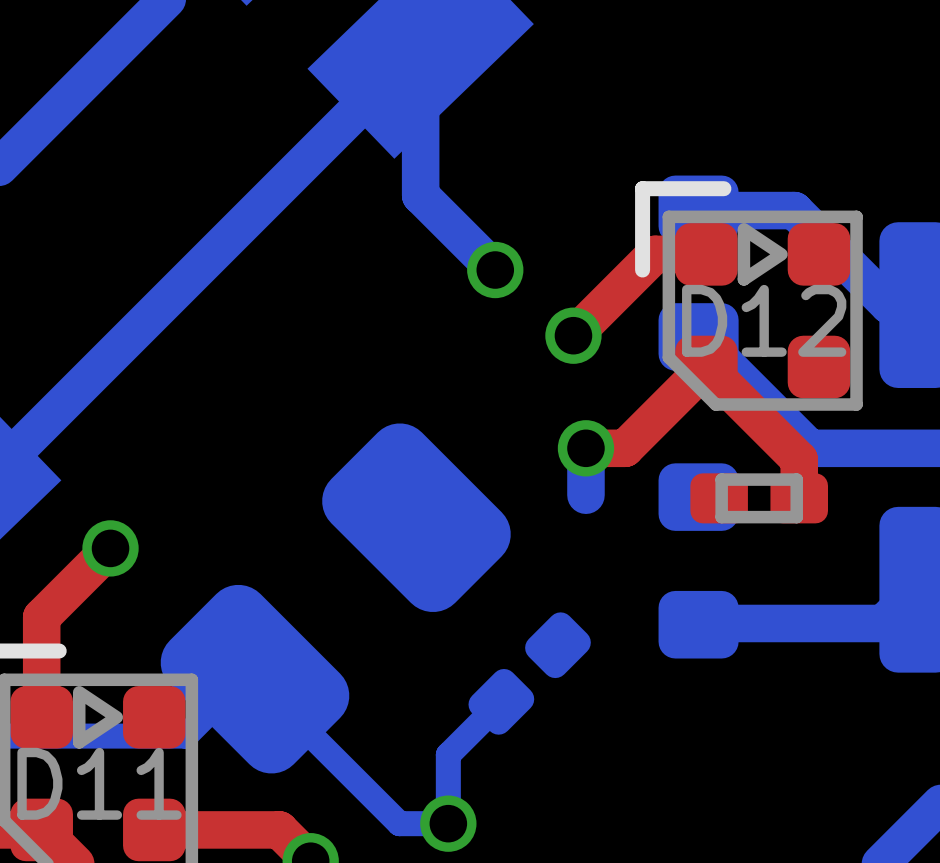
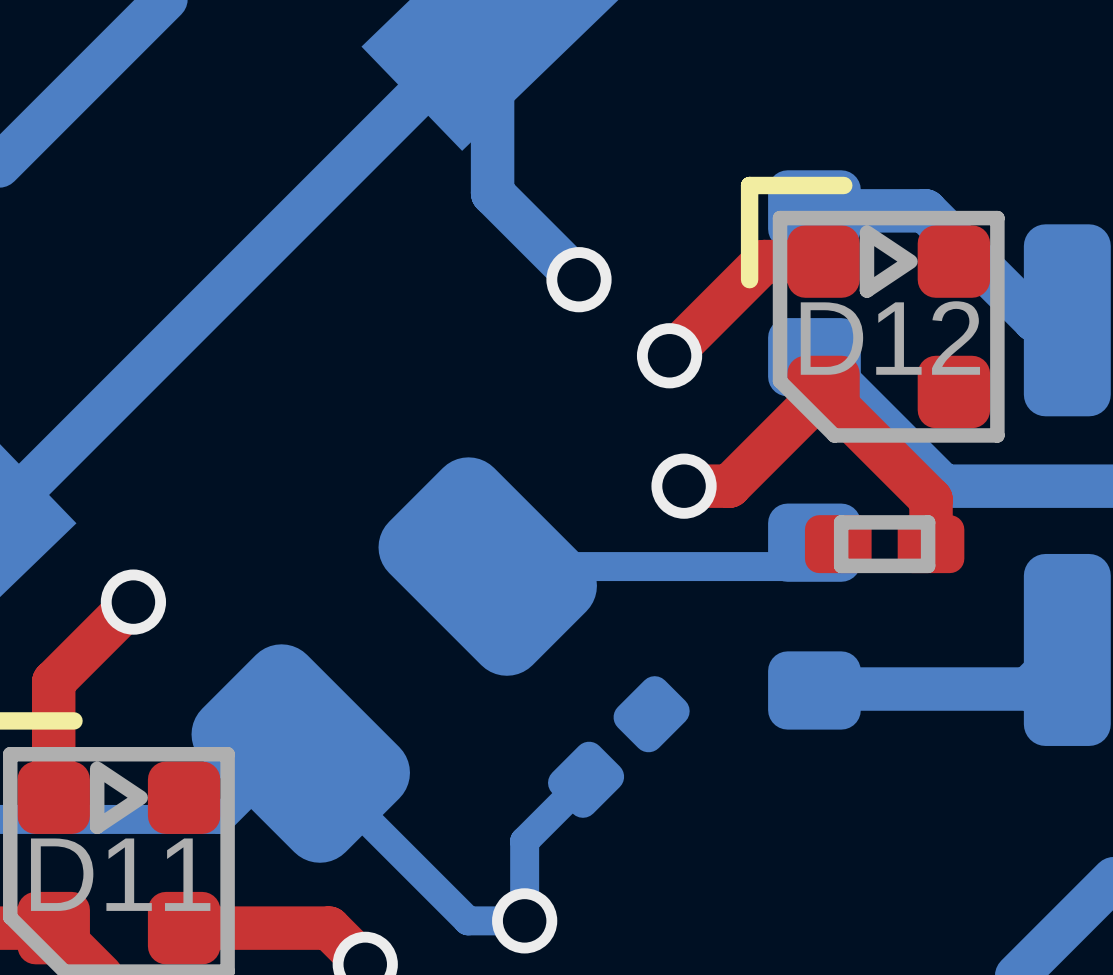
bottom track: (585, 448) (585, 495) -> none
bottom track: none -> (814, 542) (790, 566) (487, 566)

